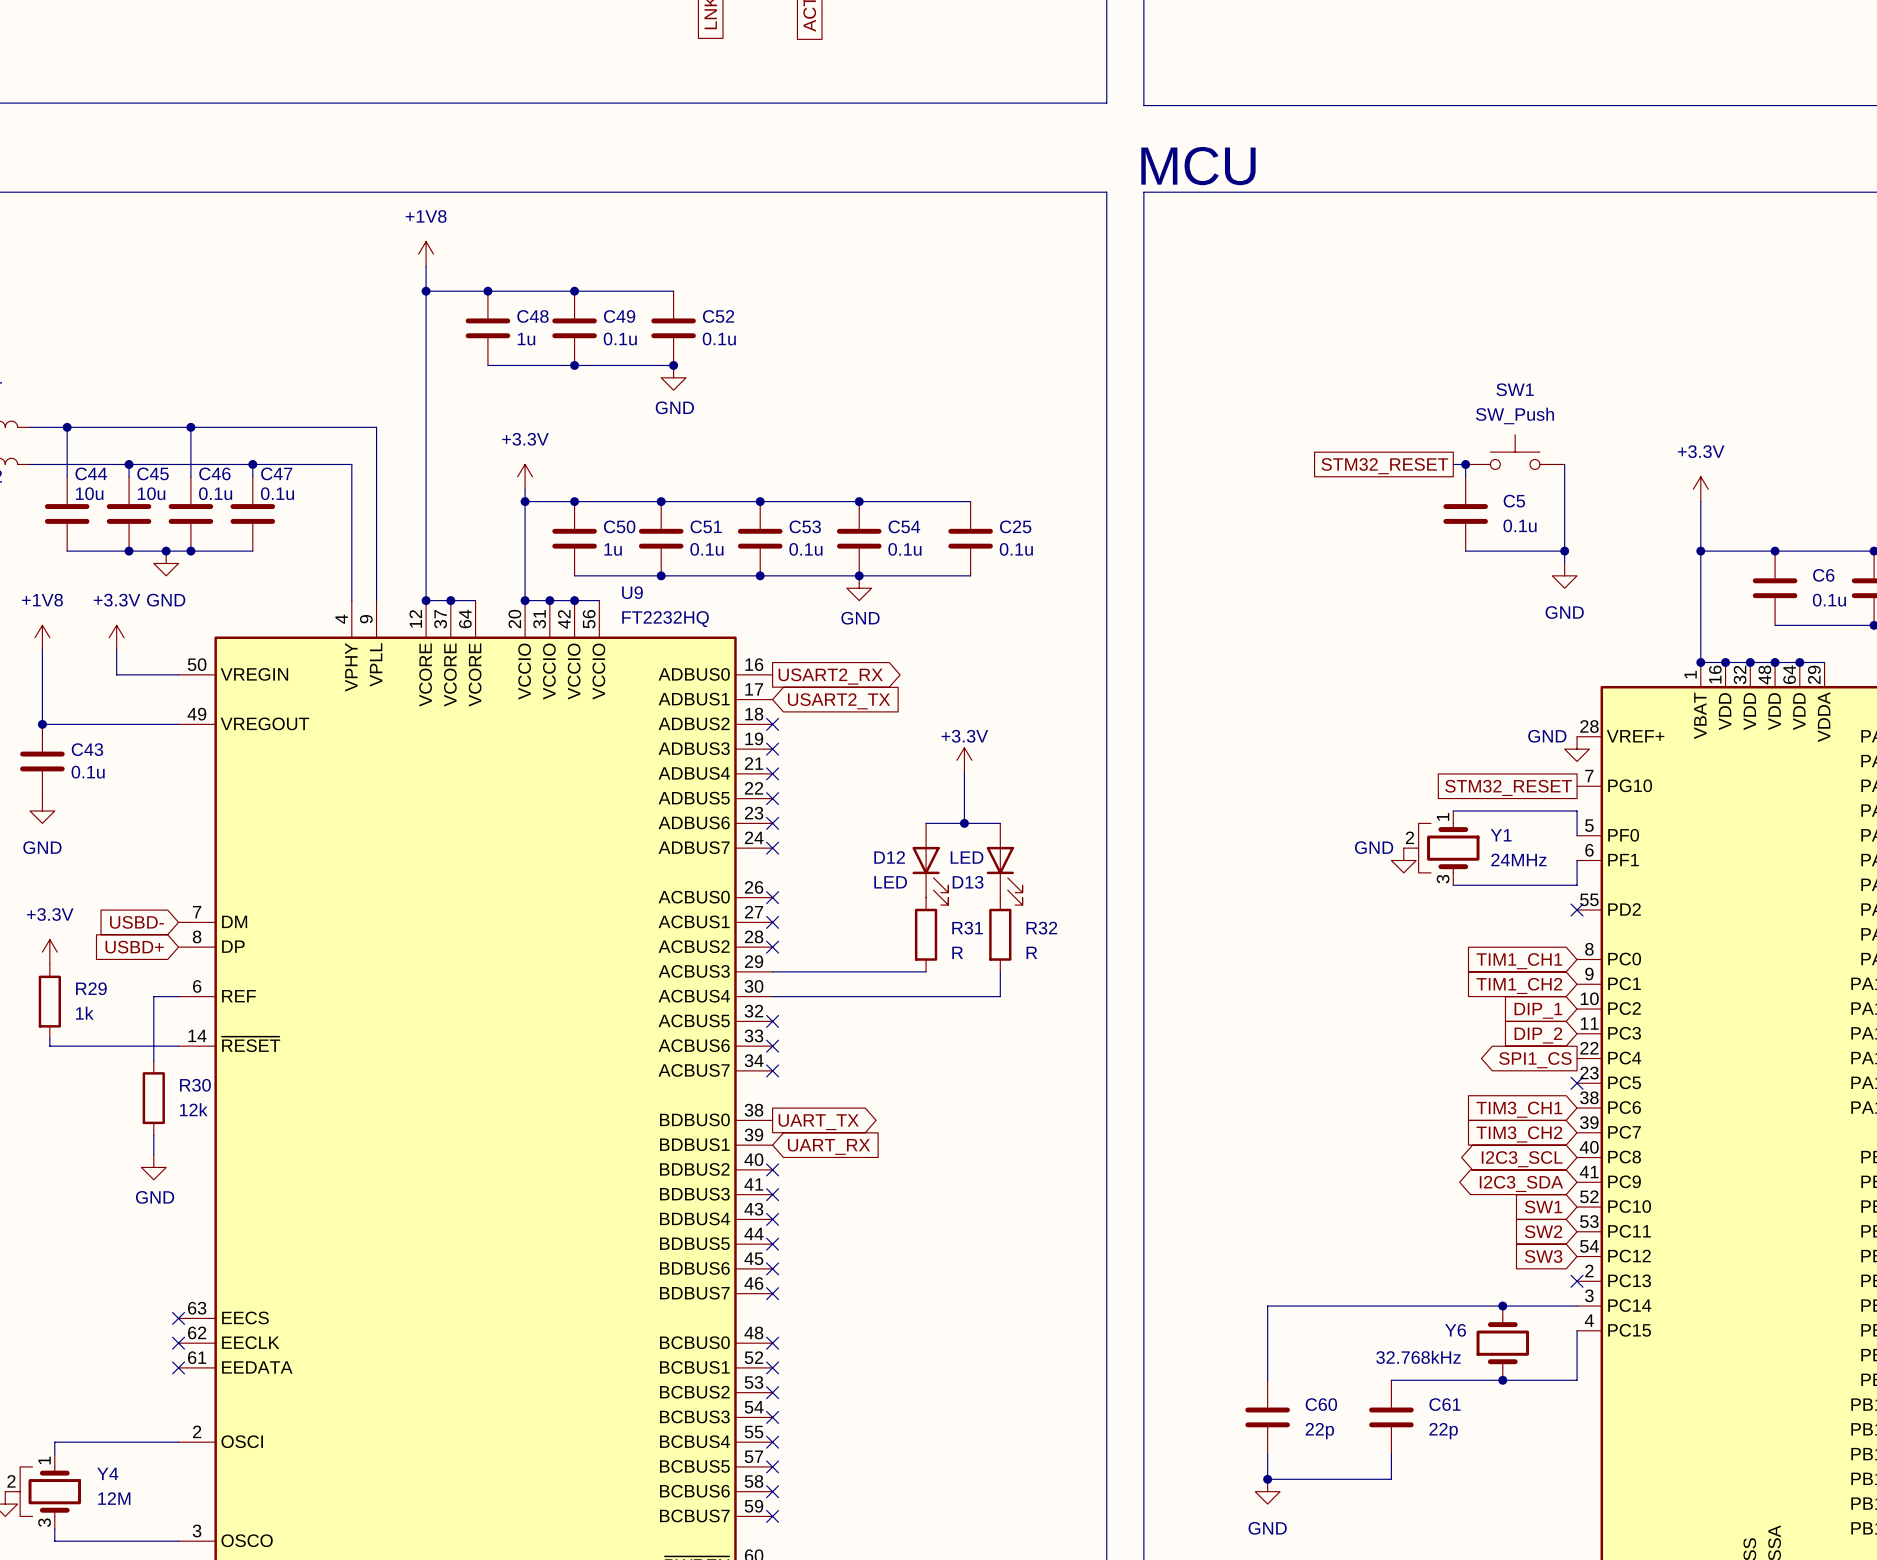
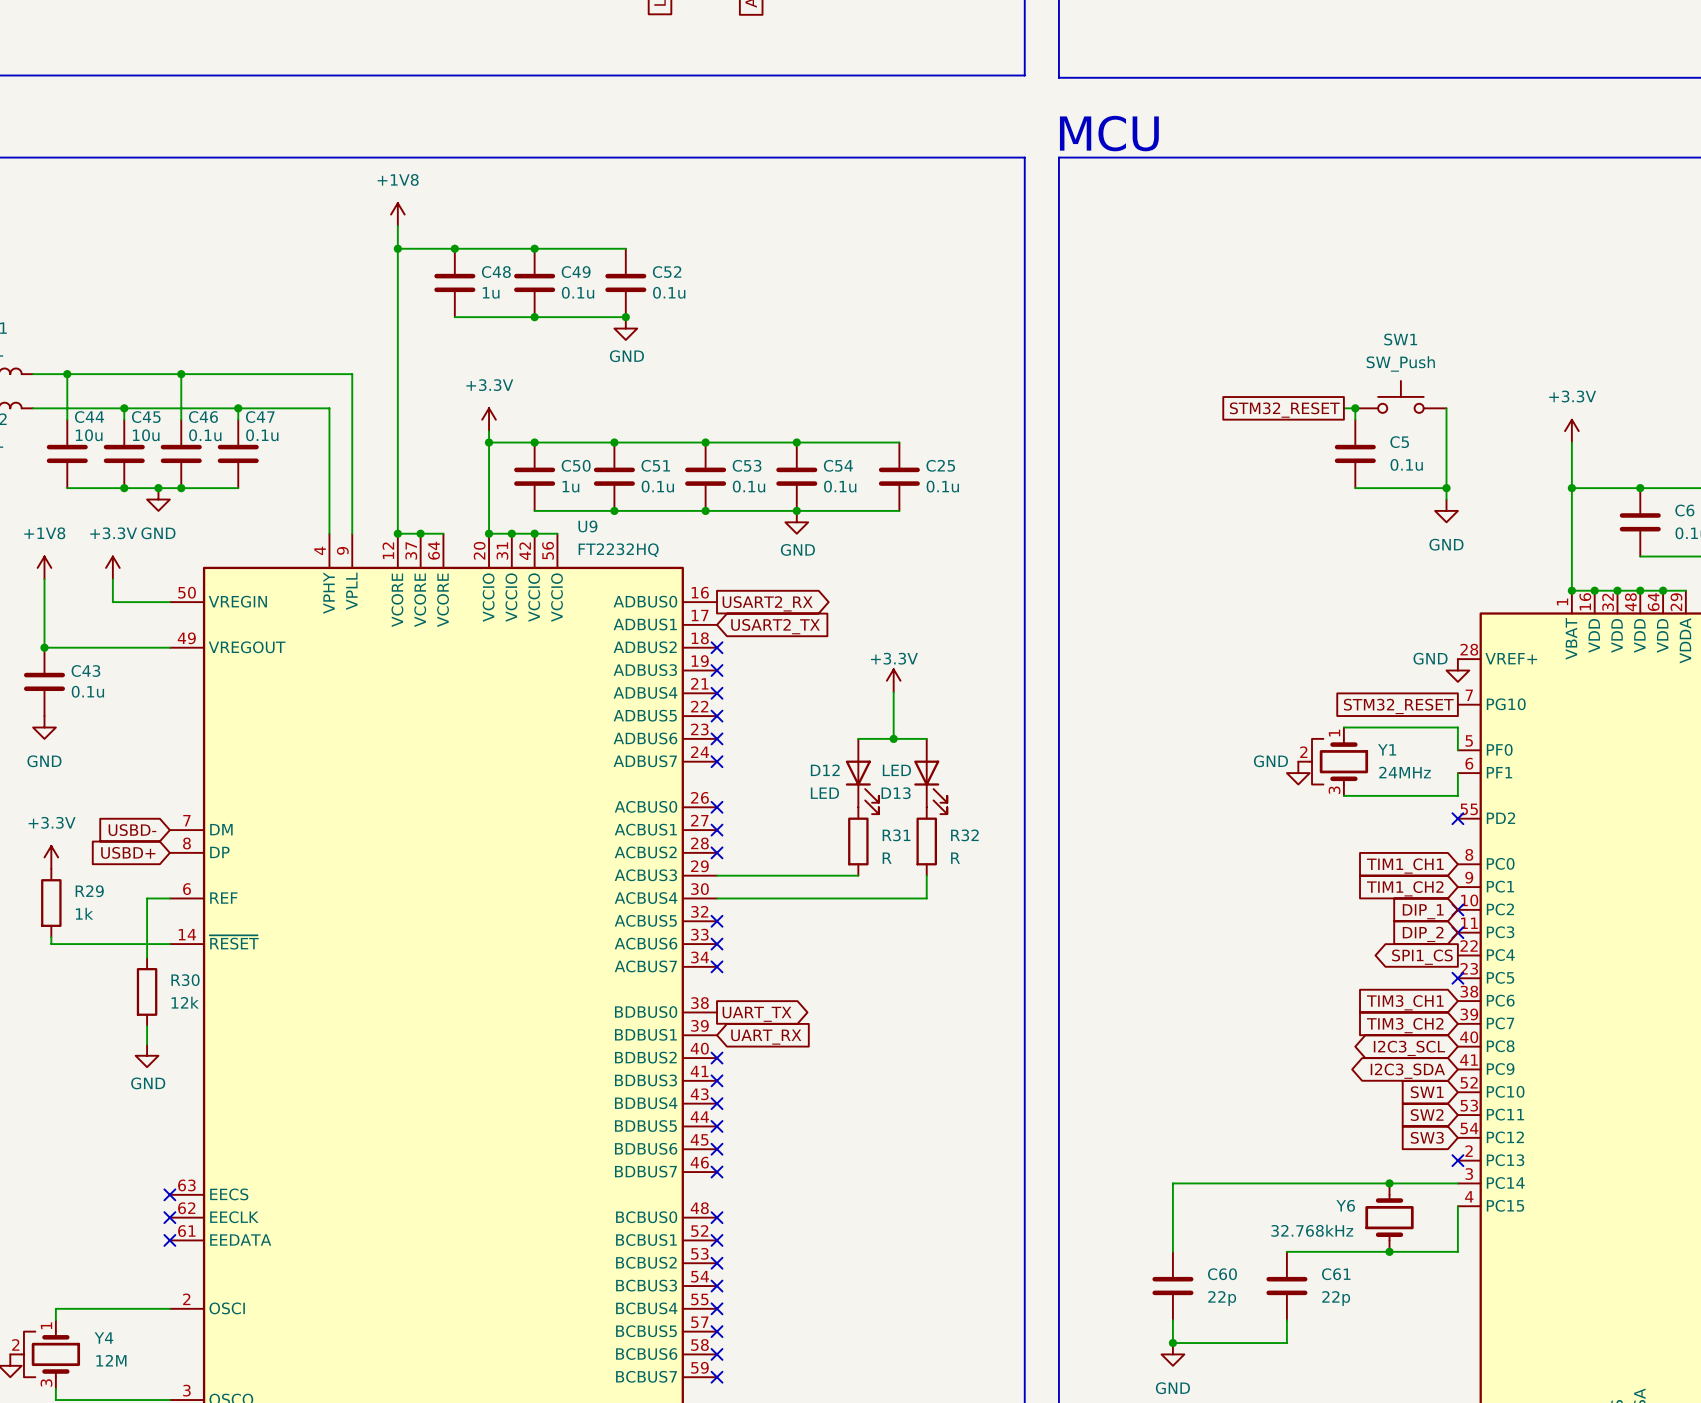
no-connect mark: none -> (1457, 909)
no-connect mark: none -> (1457, 932)

